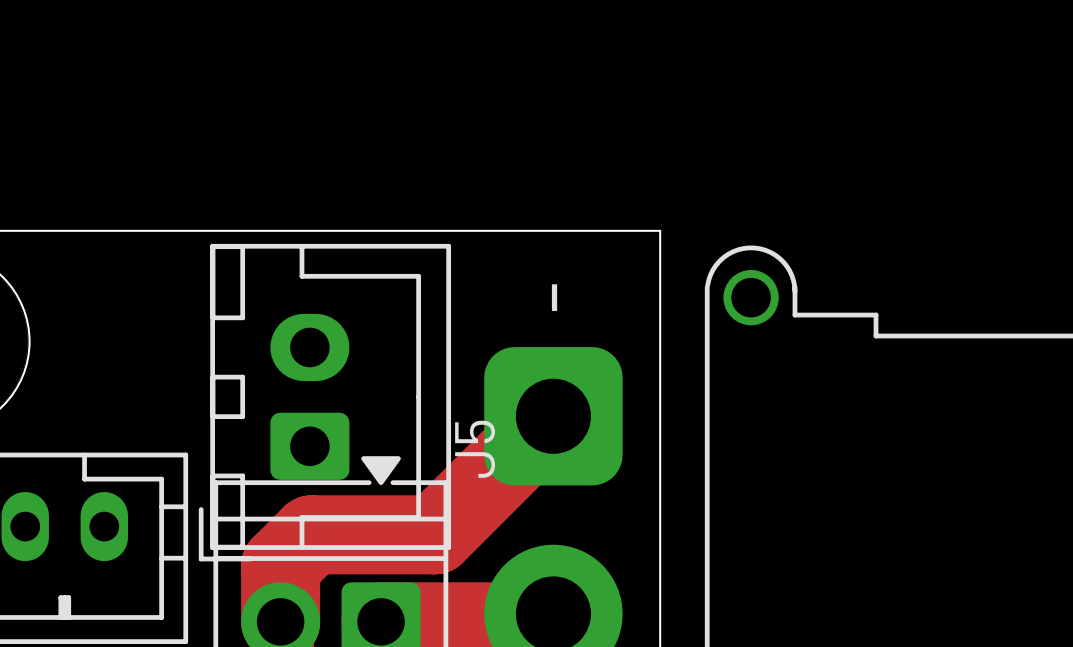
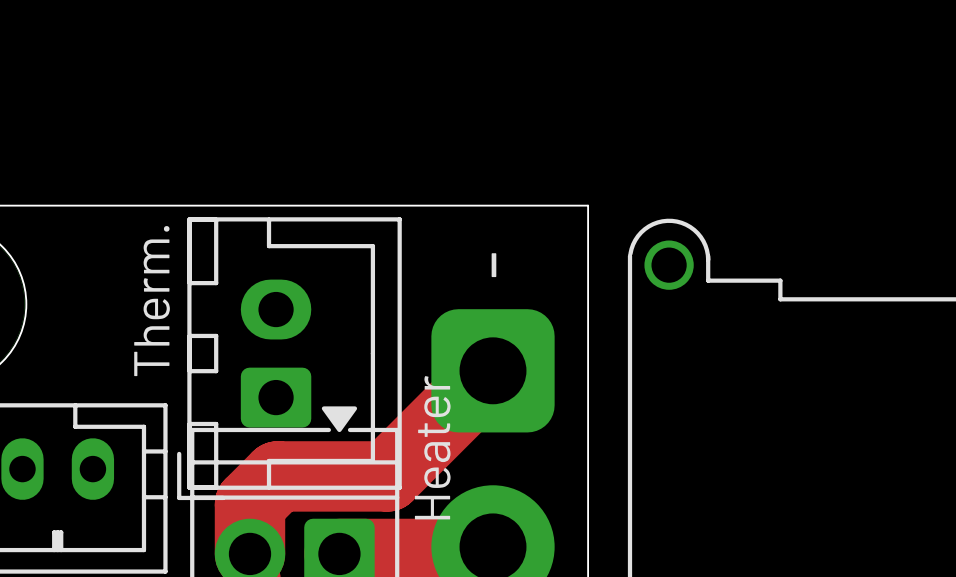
J5 value: none -> Therm. (152, 301)
J5 name: J5 (475, 449) -> none
part value: none -> Heater (432, 447)

